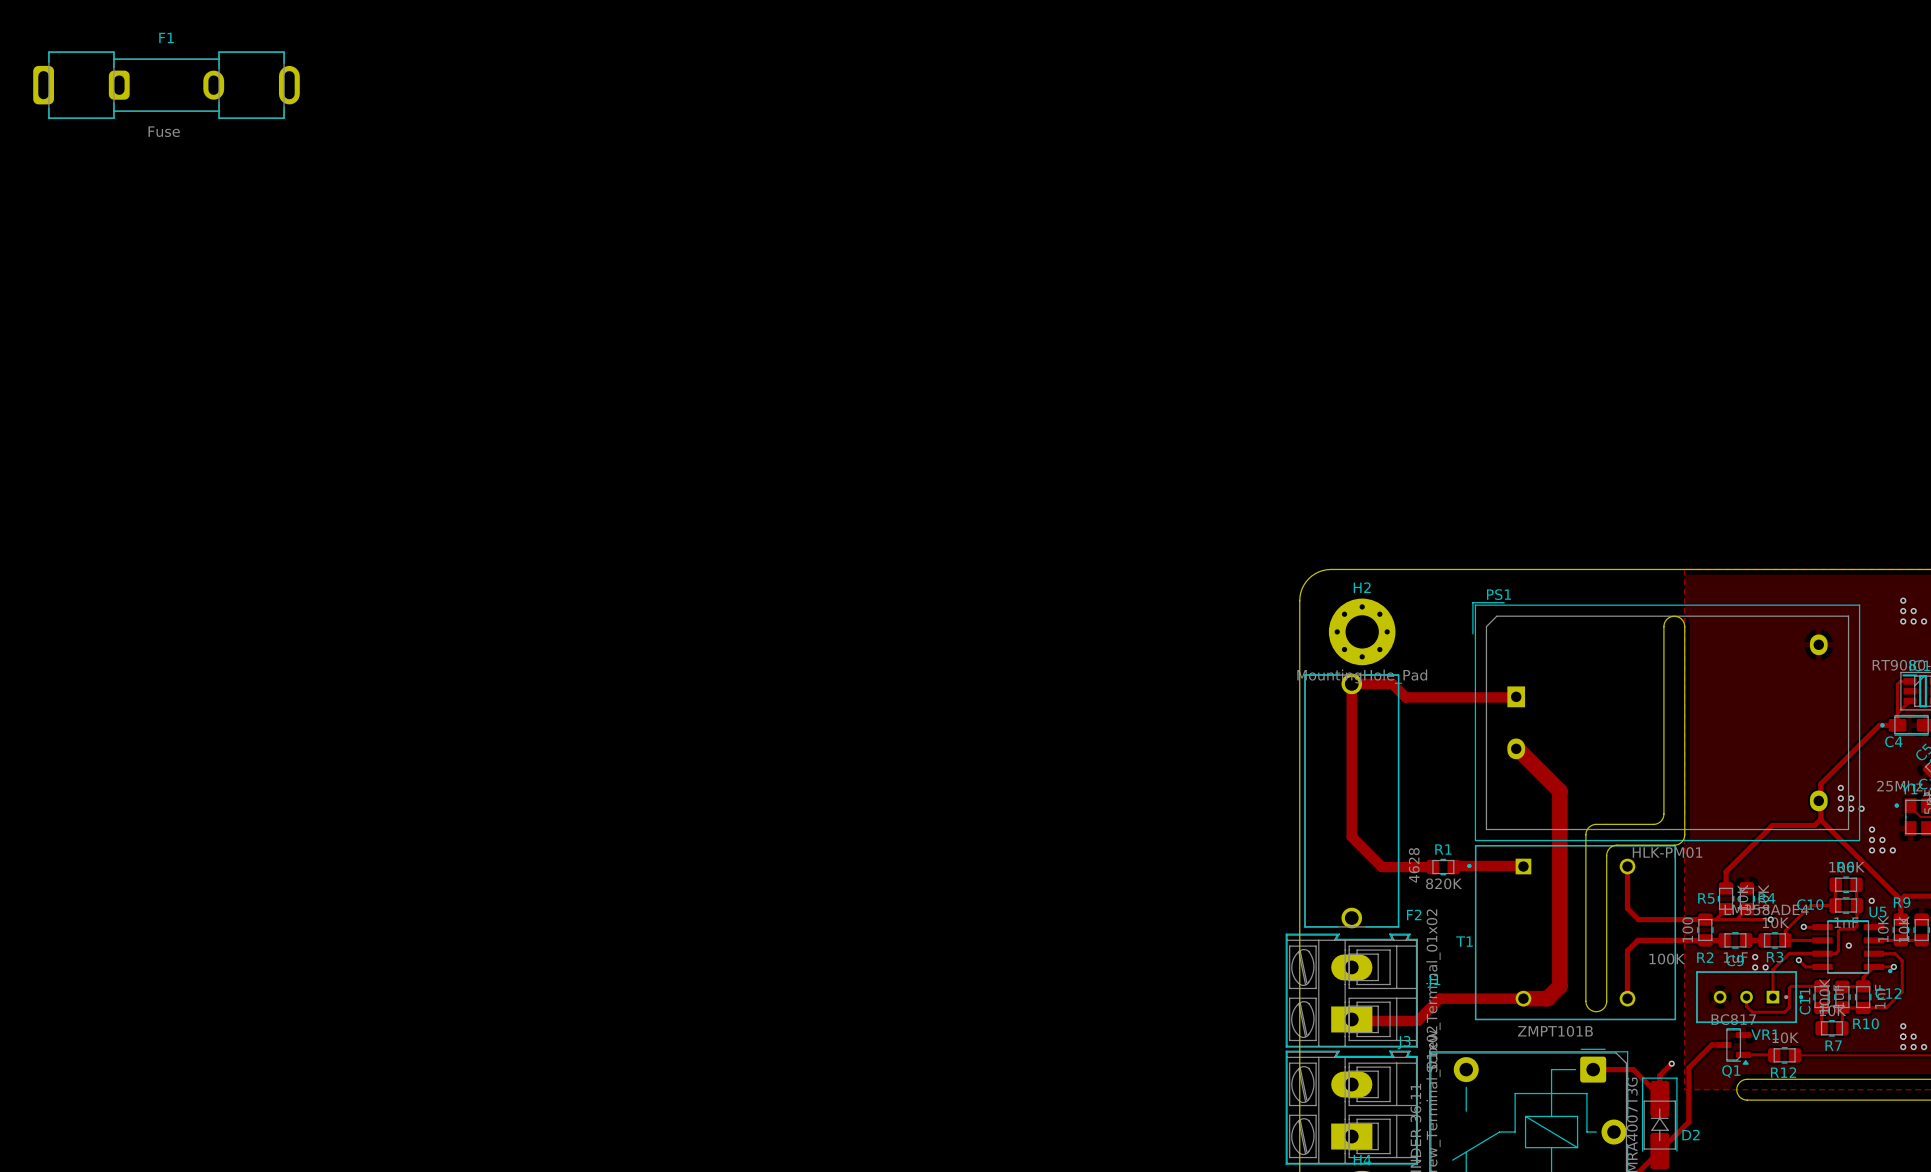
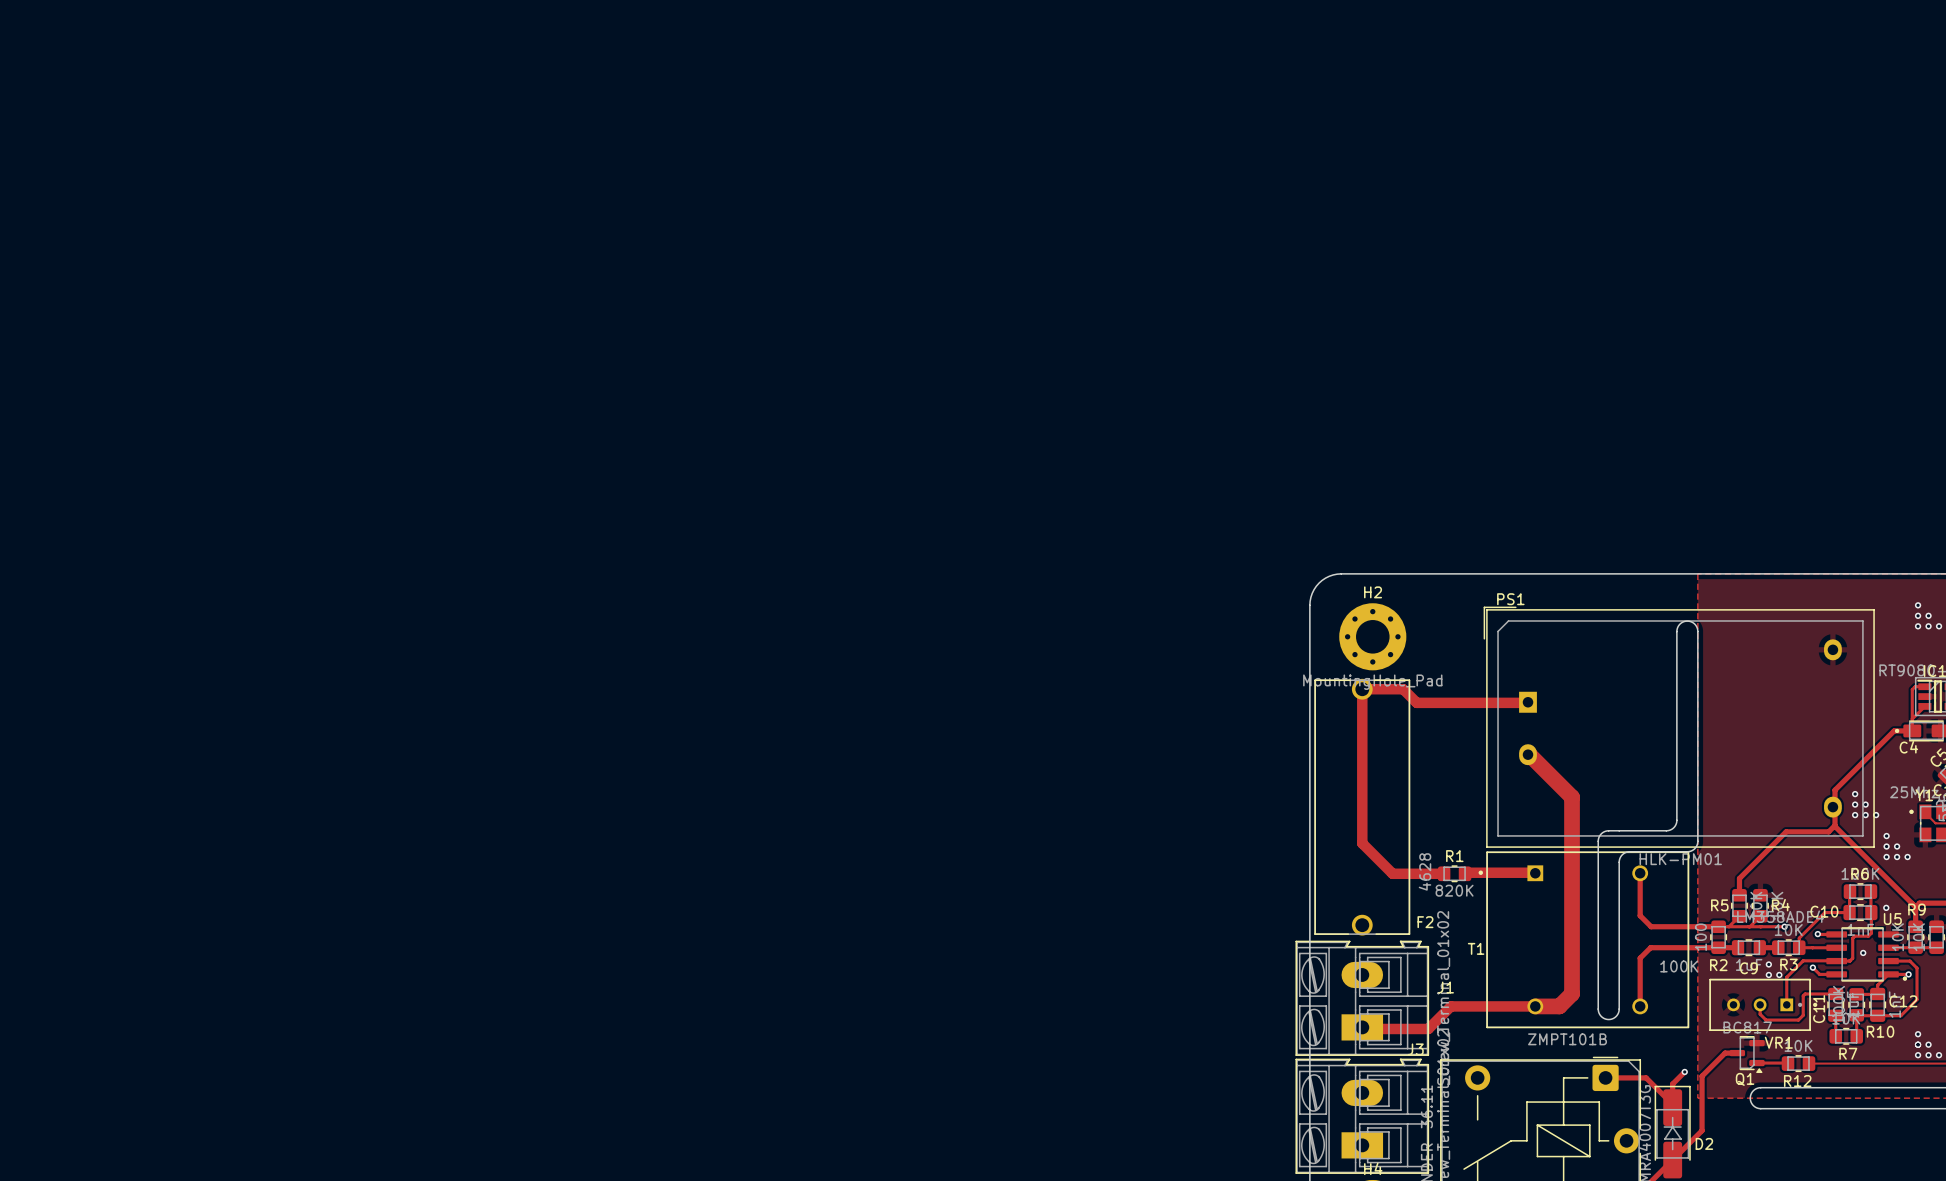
F1: Fuse (166, 85) -> none

